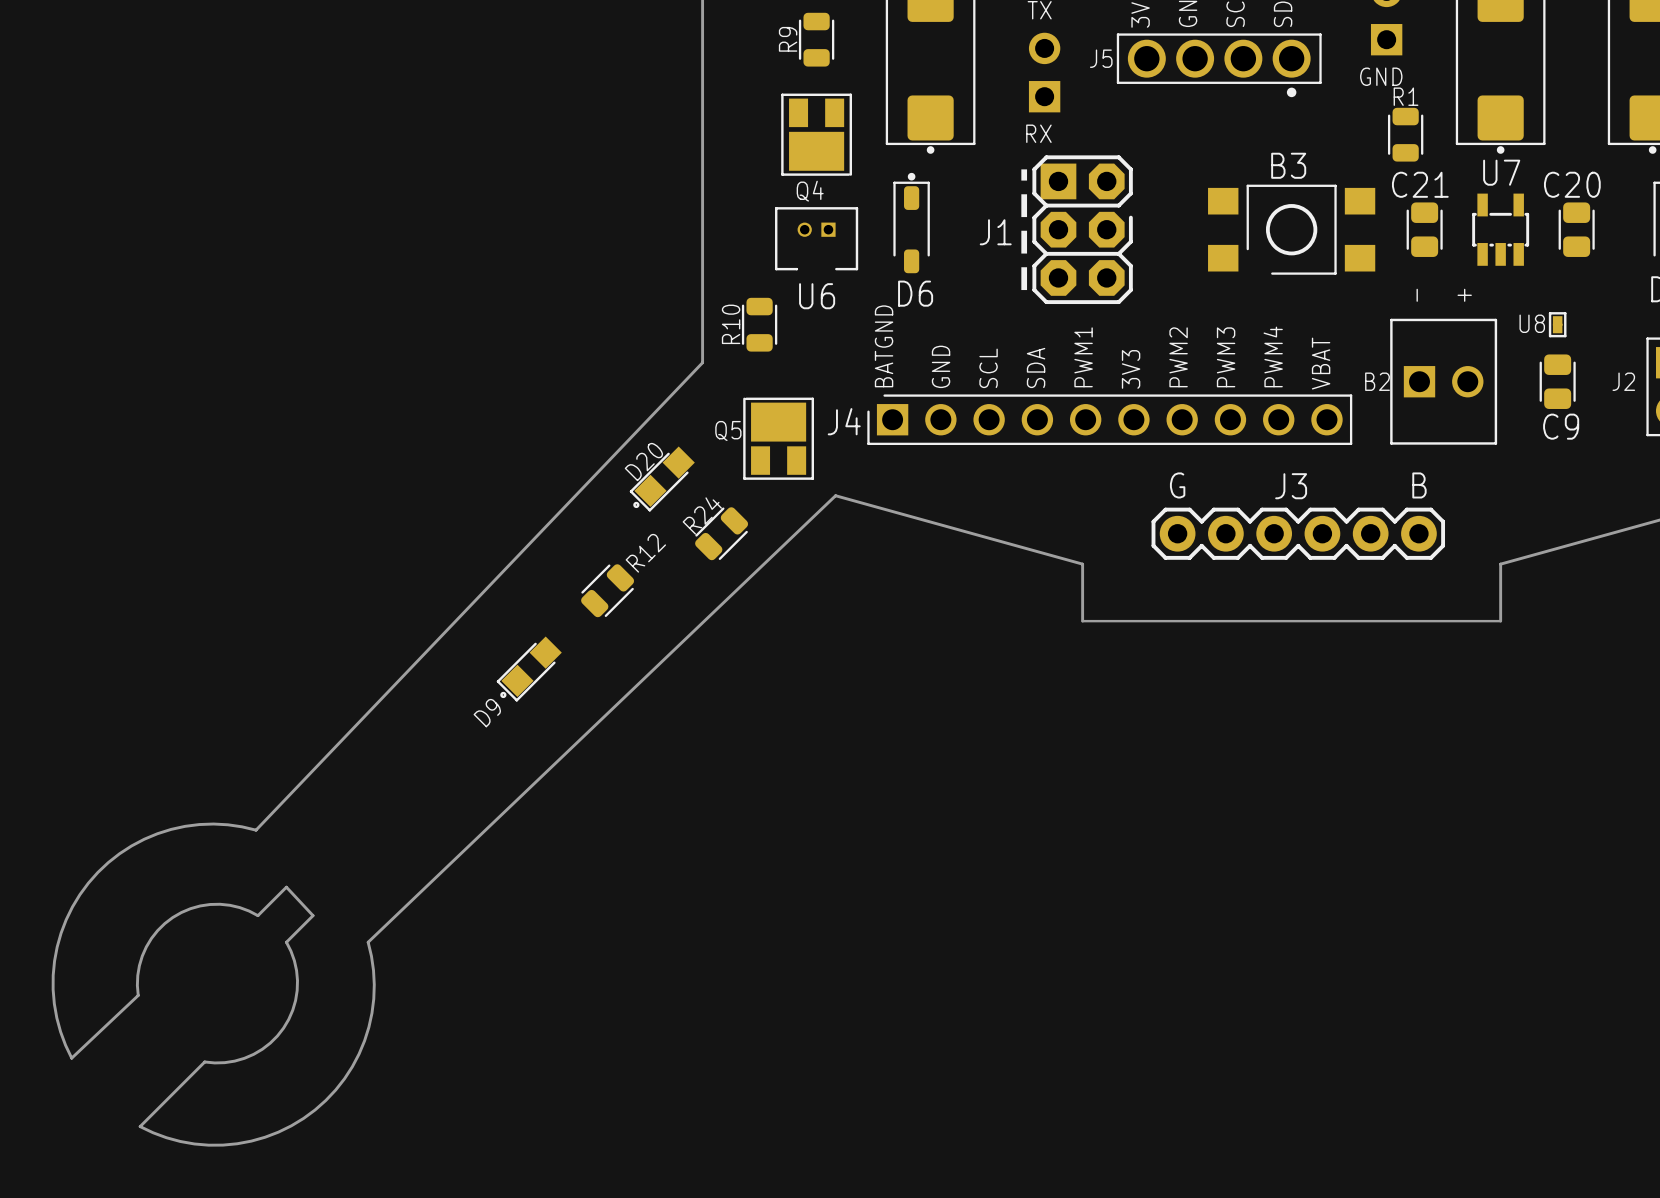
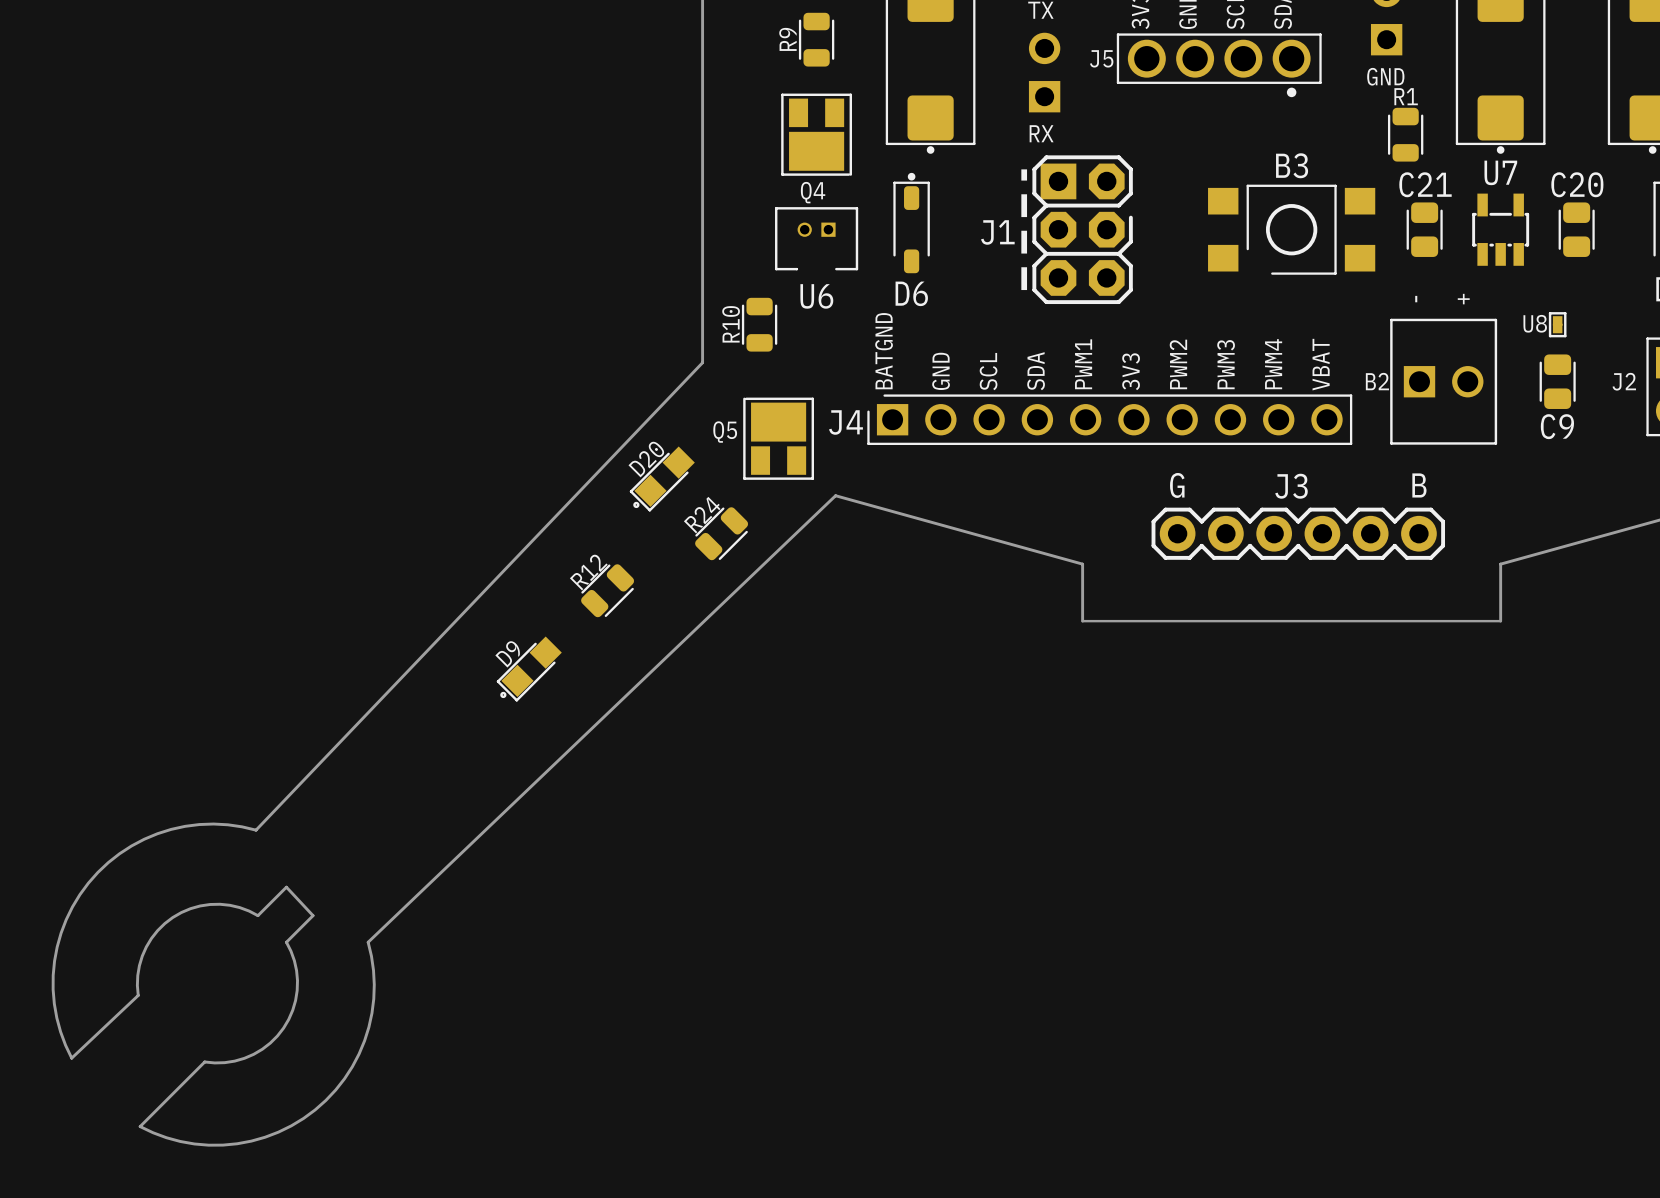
R12 name position: R12 (645, 553) -> R12 (588, 572)
D9 name position: D9 (487, 713) -> D9 (507, 654)

